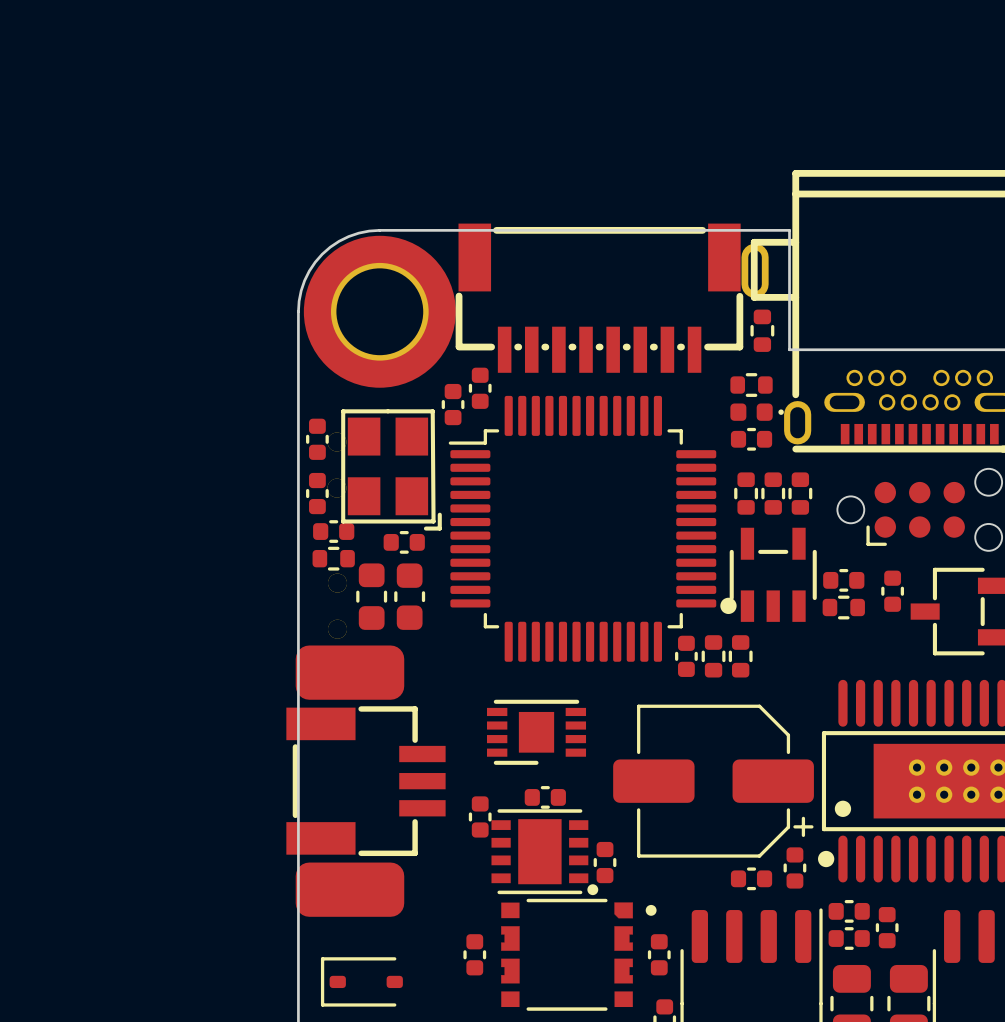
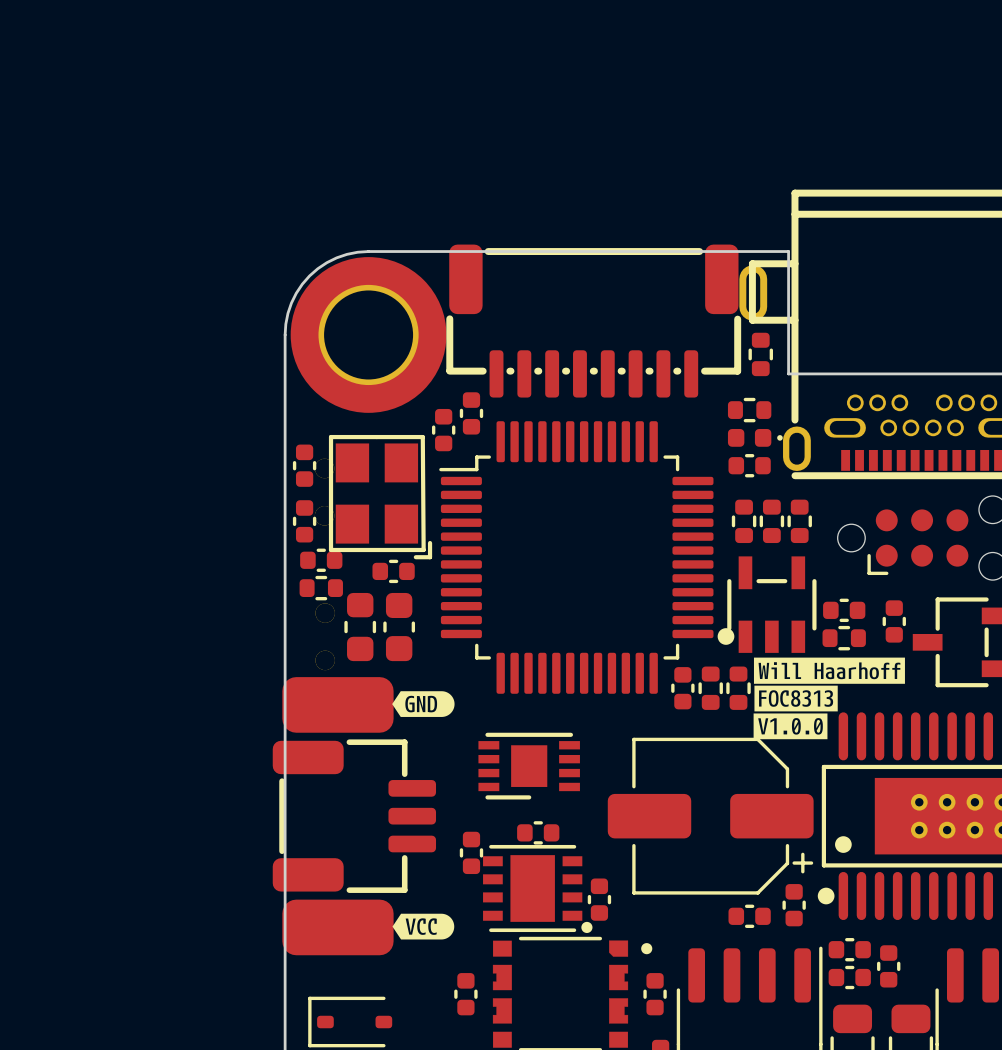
part footprint: [455, 223, 744, 373] -> [446, 244, 742, 398]
drawing: none -> [753, 657, 905, 740]
drawing: none -> [392, 691, 455, 717]
part footprint: [286, 706, 446, 857] -> [272, 739, 437, 893]
drawing: none -> [392, 913, 455, 940]

